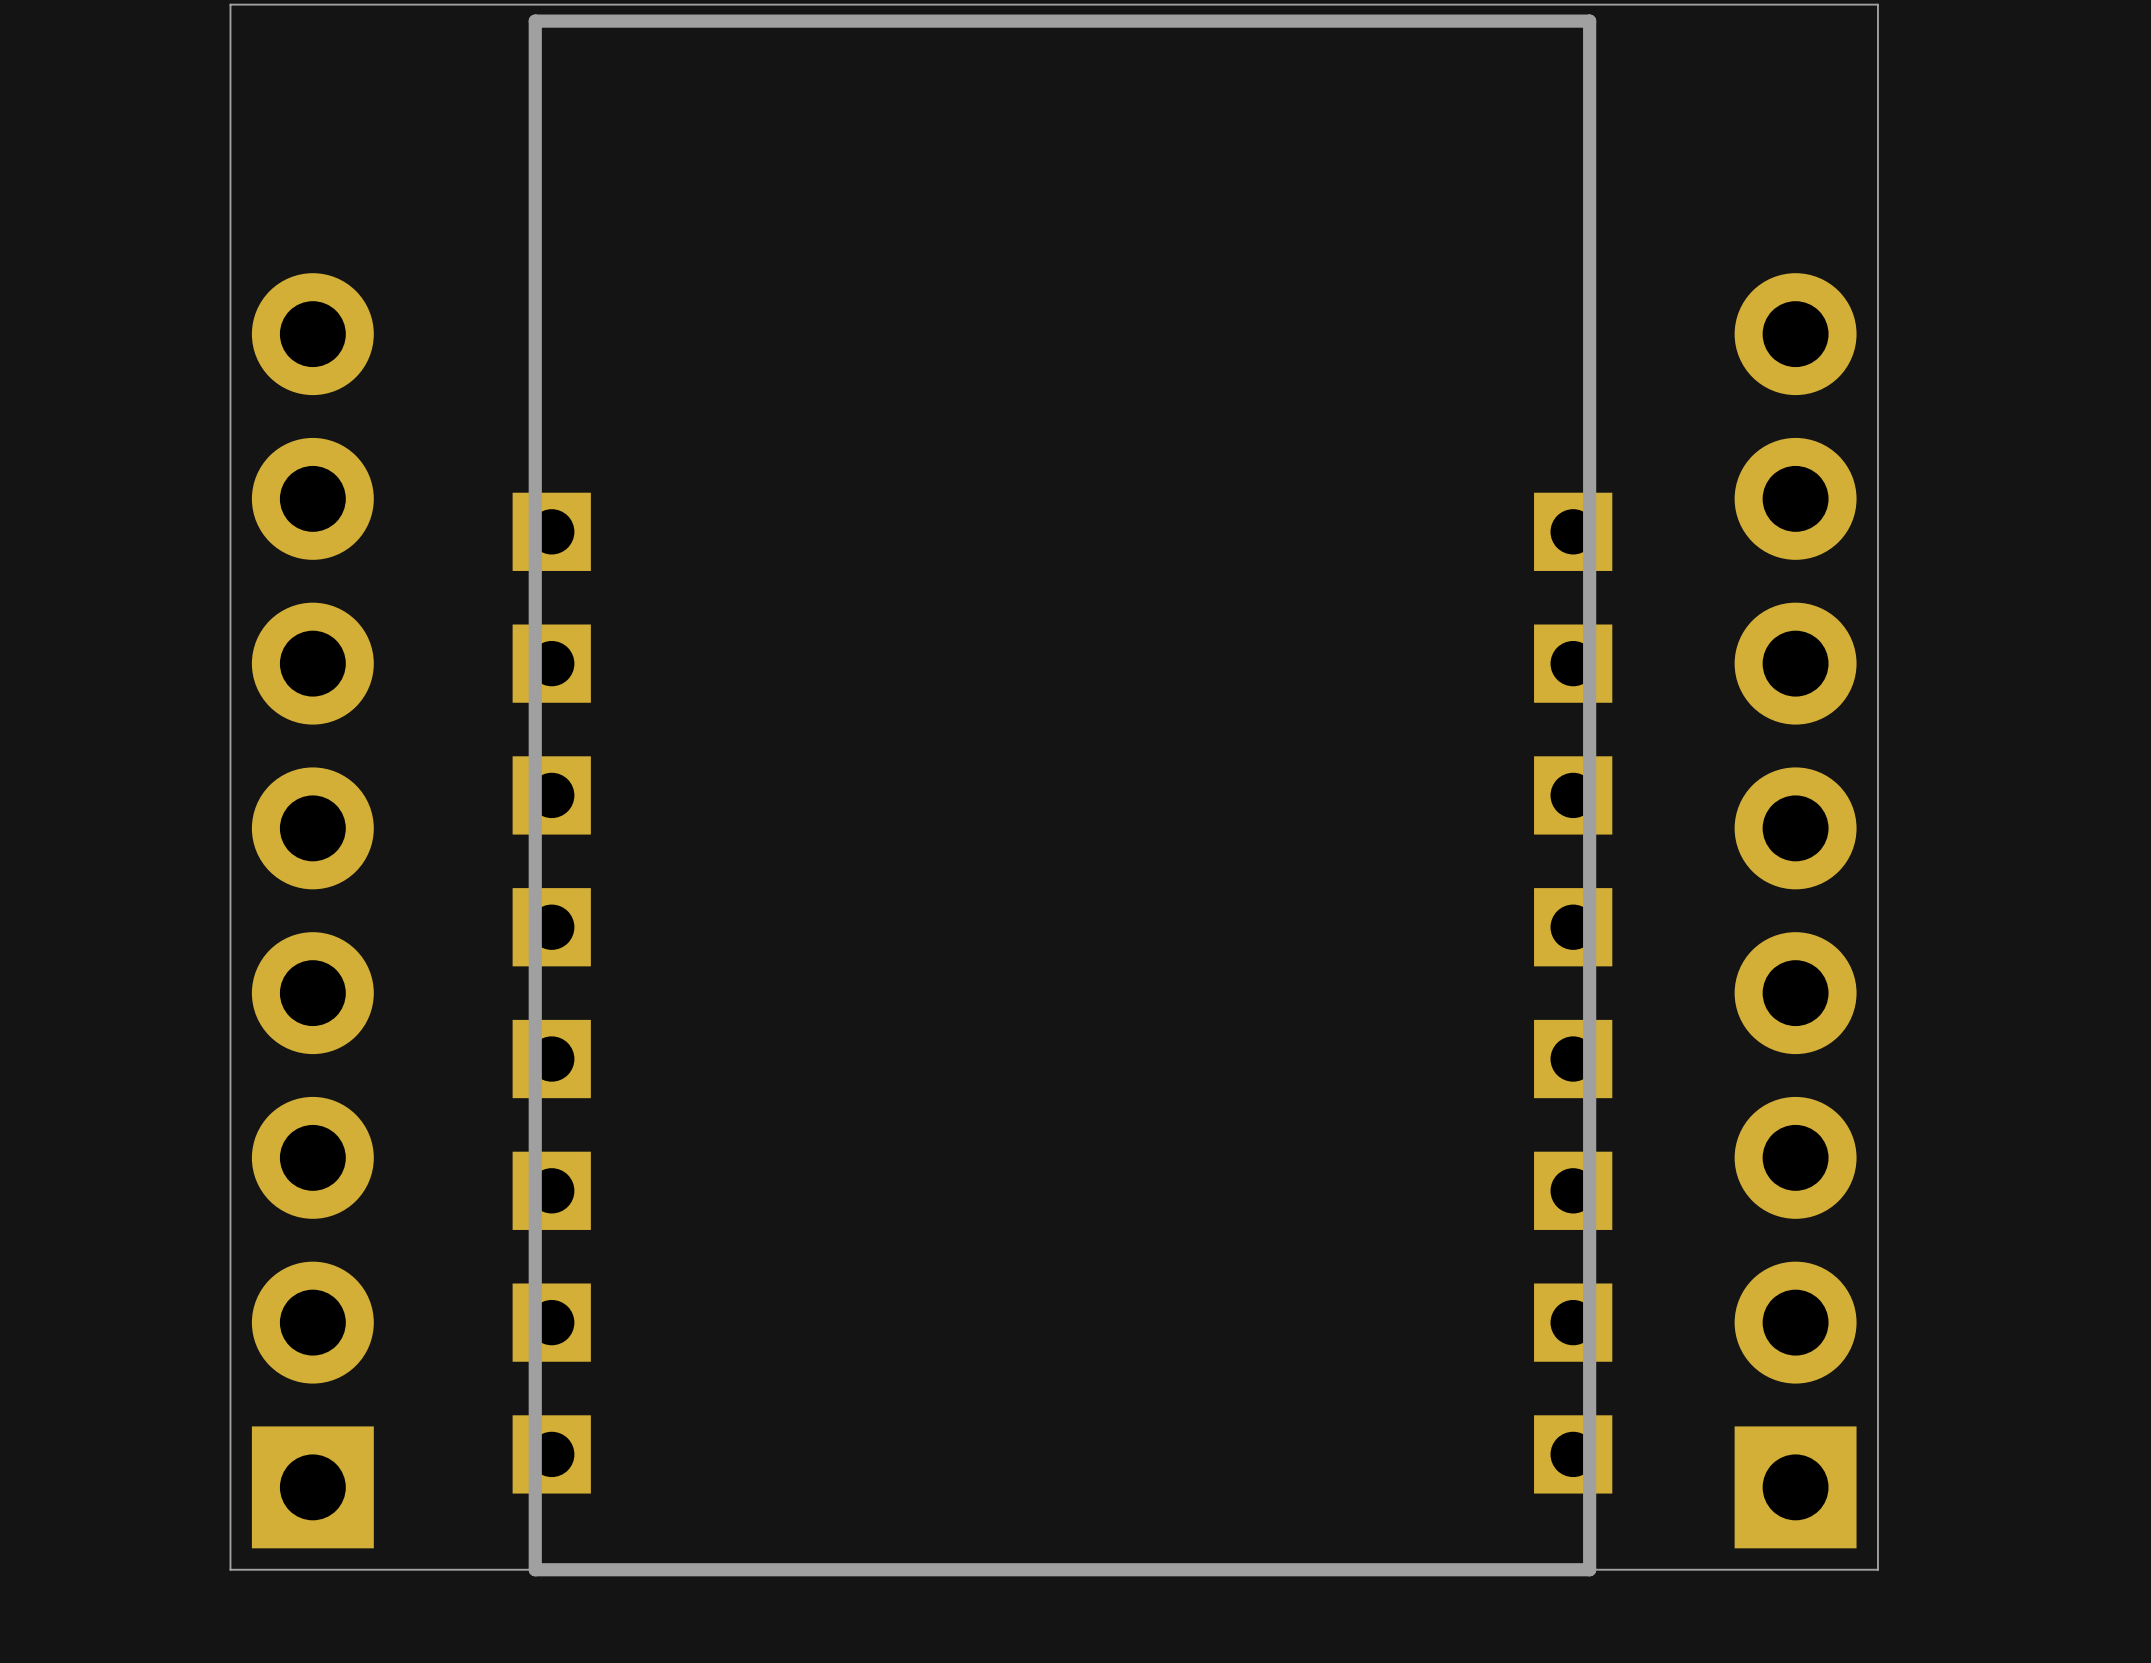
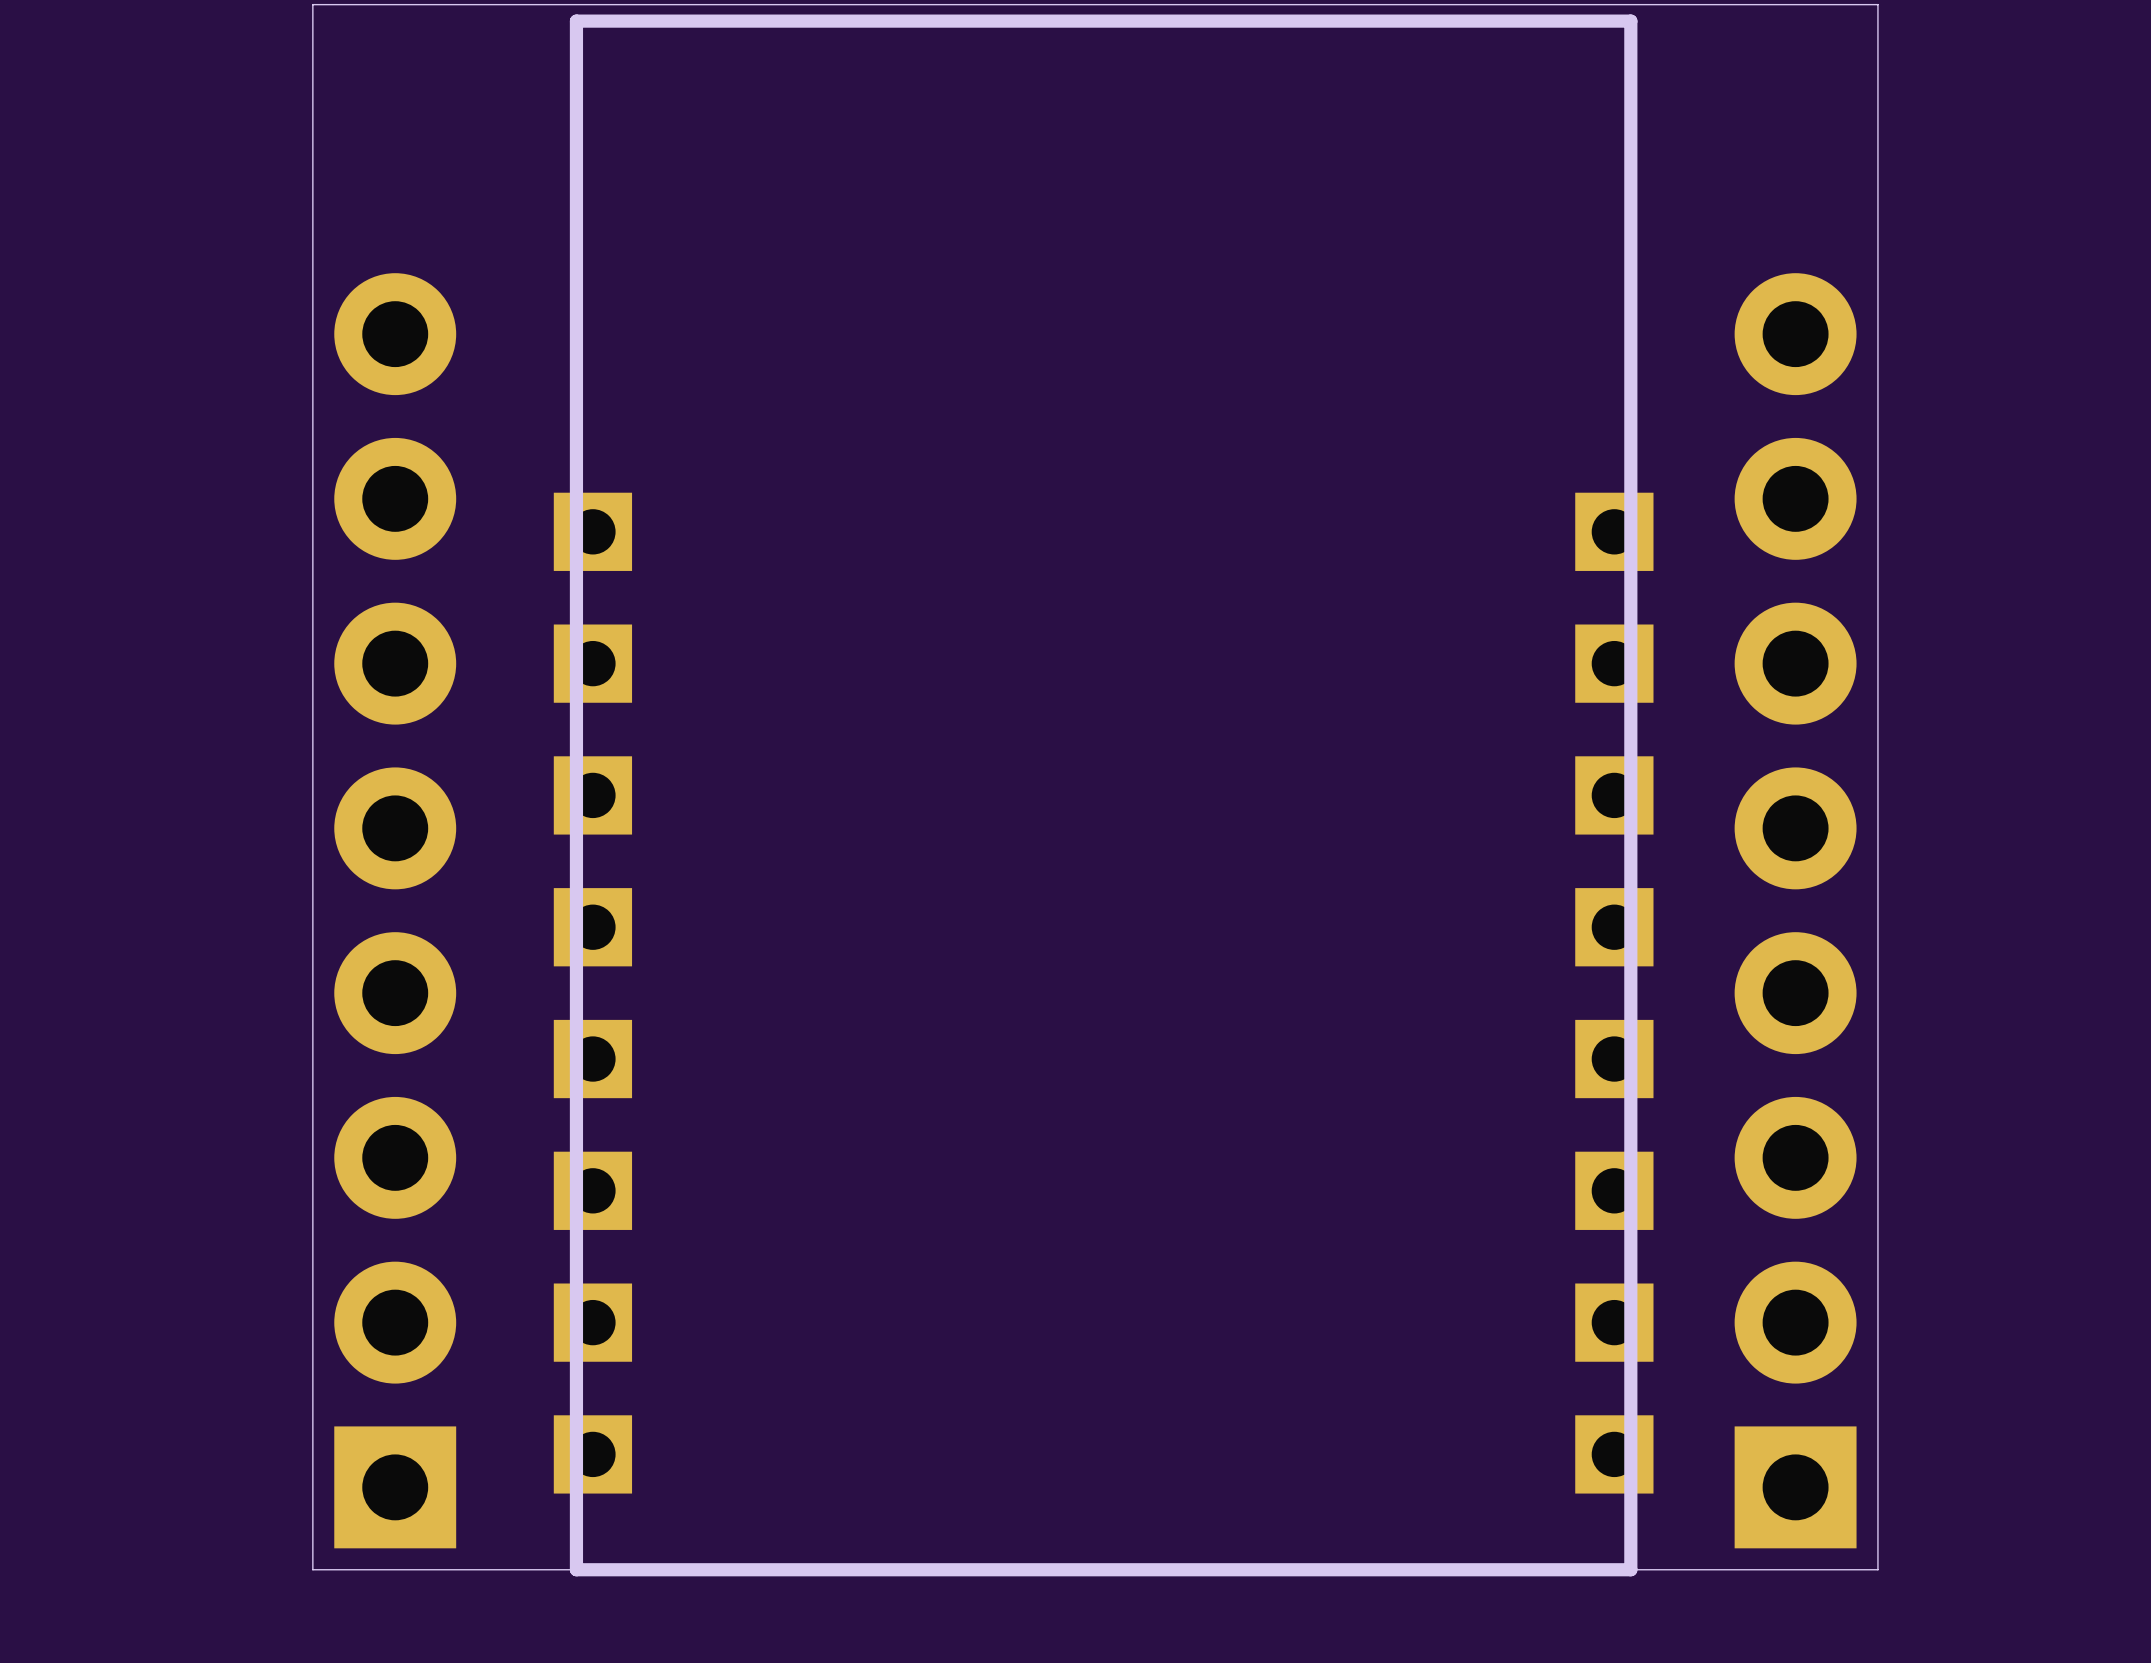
board edge: (312, 4) (230, 4) (230, 1569) (312, 1569) -> (312, 4) (312, 1569)
part position: (1062, 795) -> (1103, 795)
part position: (312, 910) -> (395, 910)

